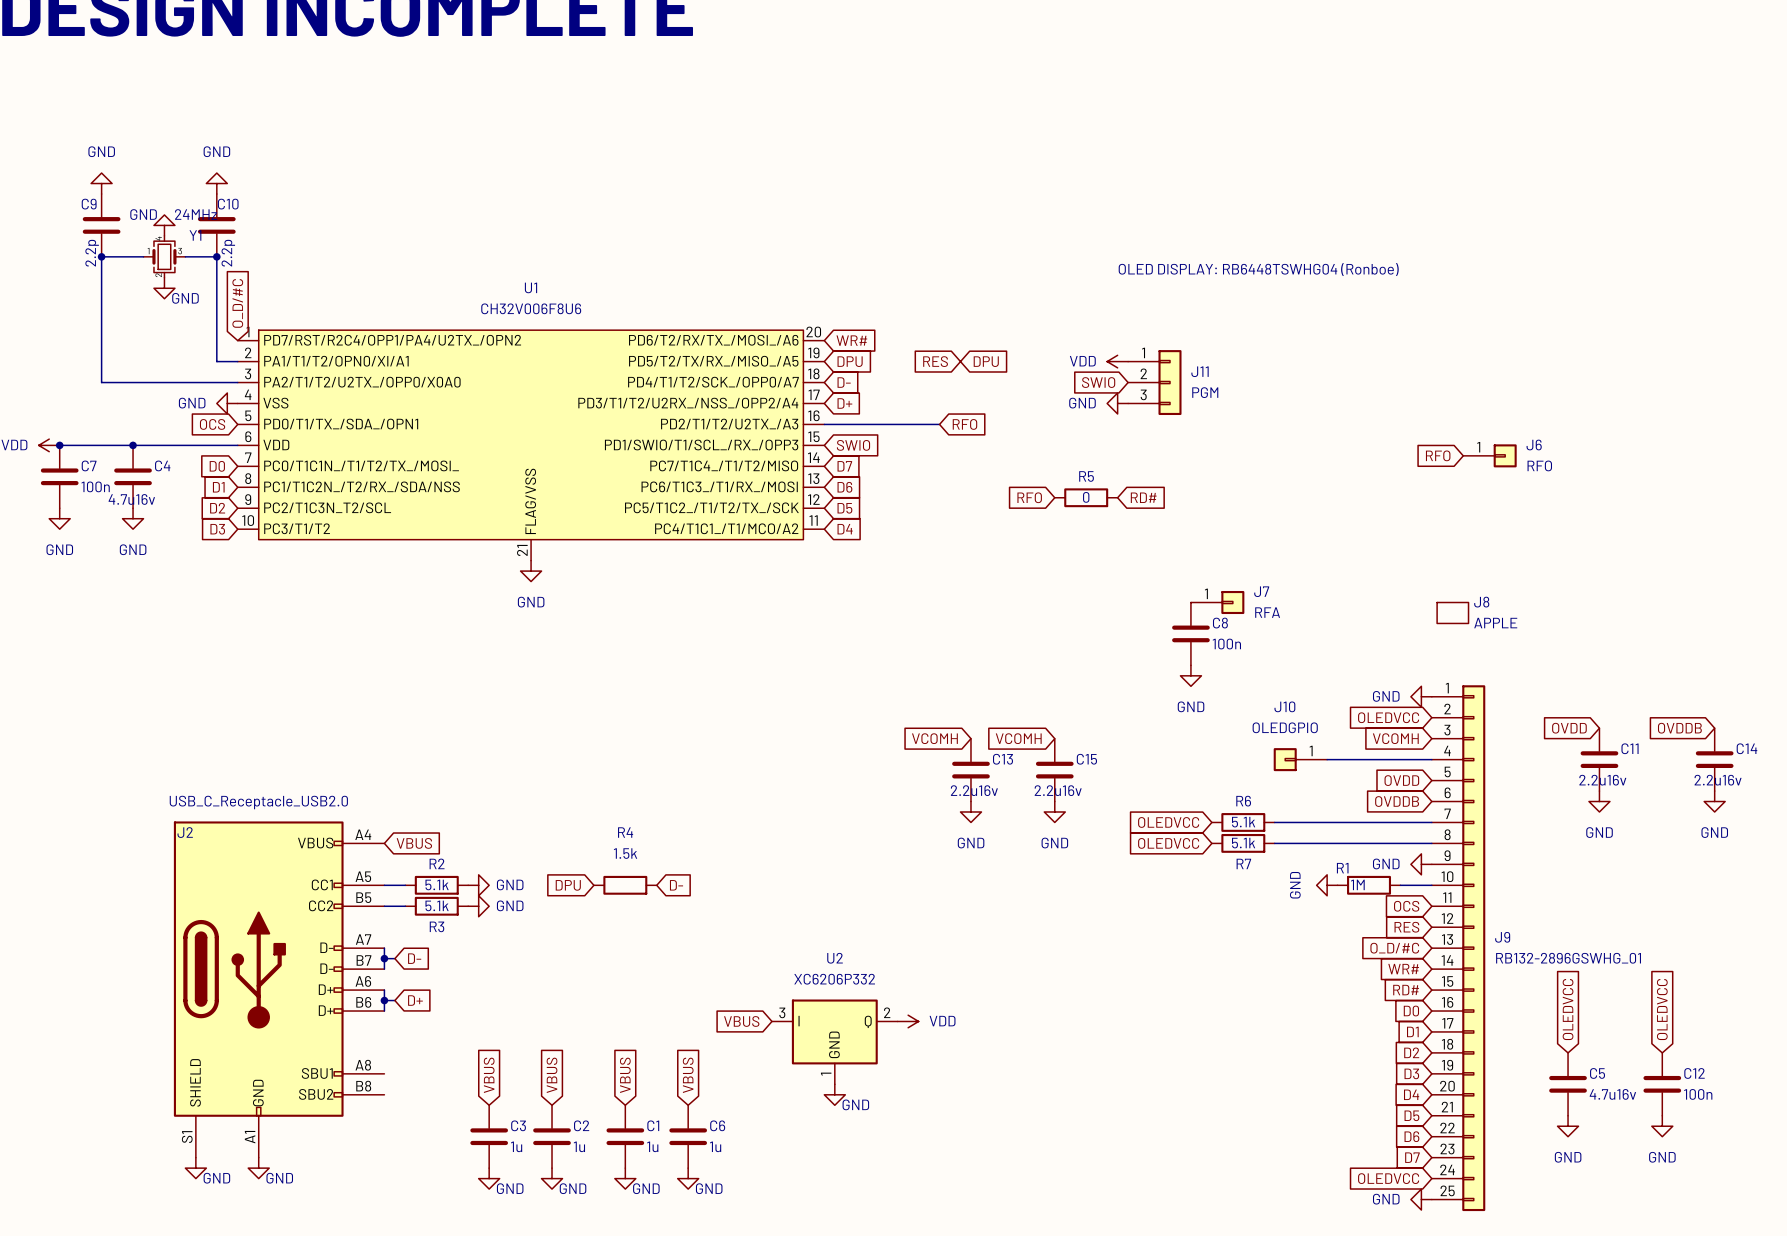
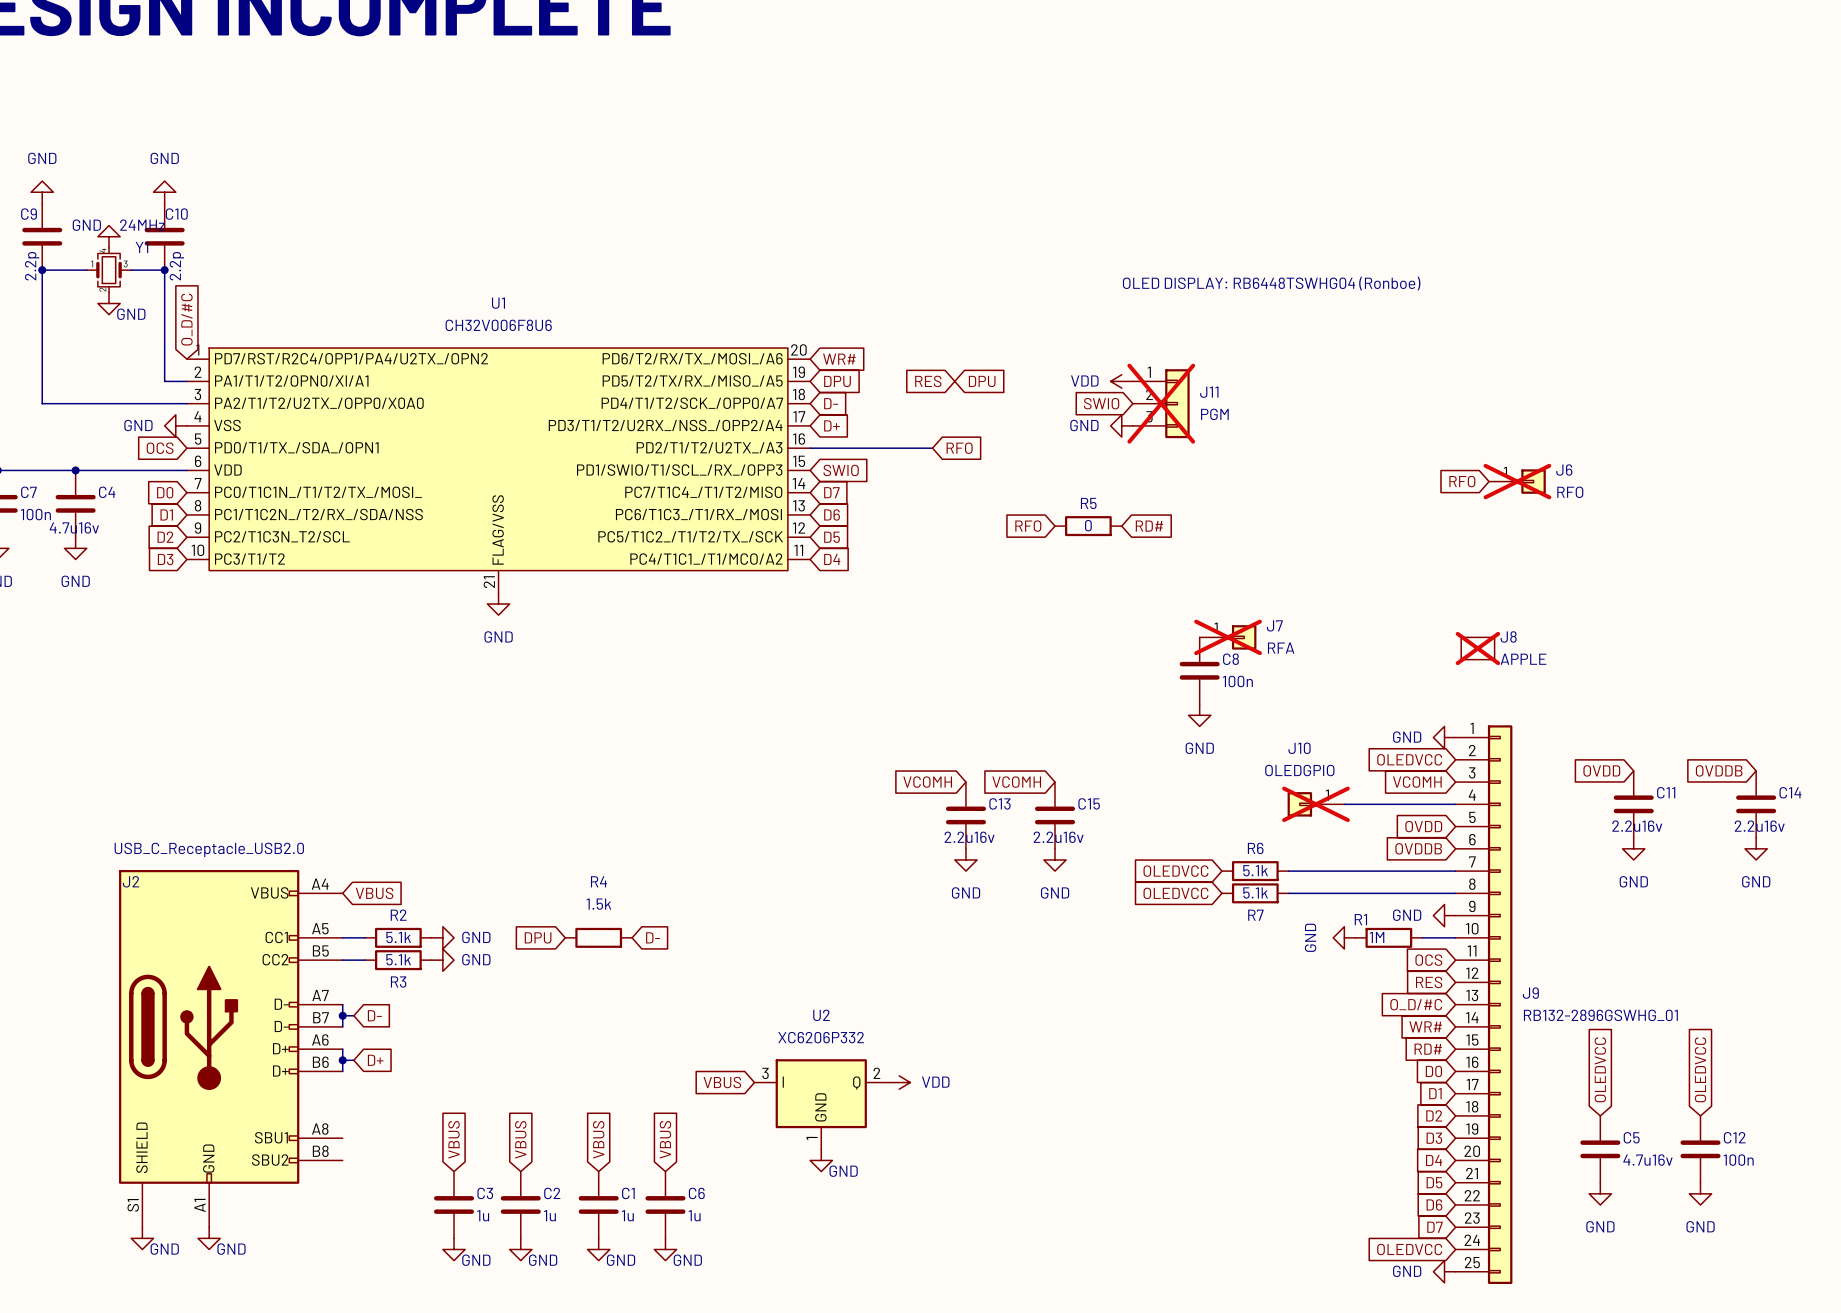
J11 do-not-place cross: none -> (1161, 403)
J6 do-not-place cross: none -> (1517, 481)
J7 do-not-place cross: none -> (1228, 637)
J8 do-not-place cross: none -> (1477, 648)
J10 do-not-place cross: none -> (1315, 804)

